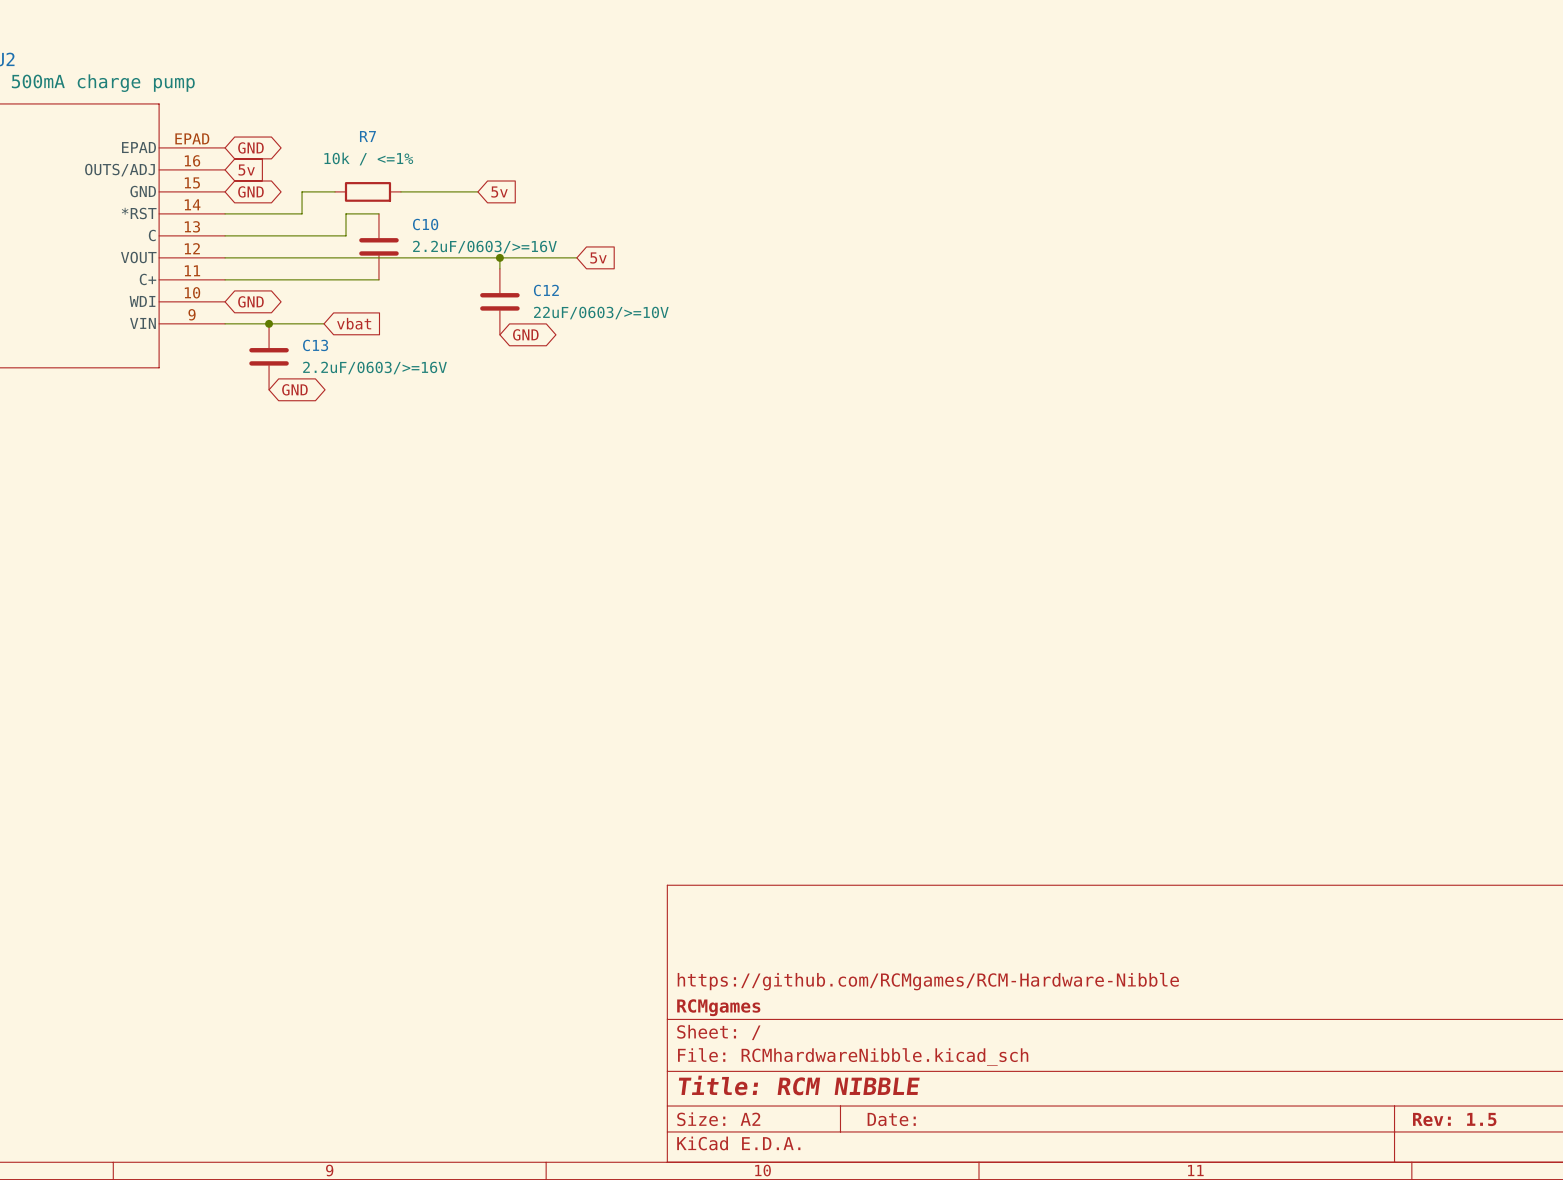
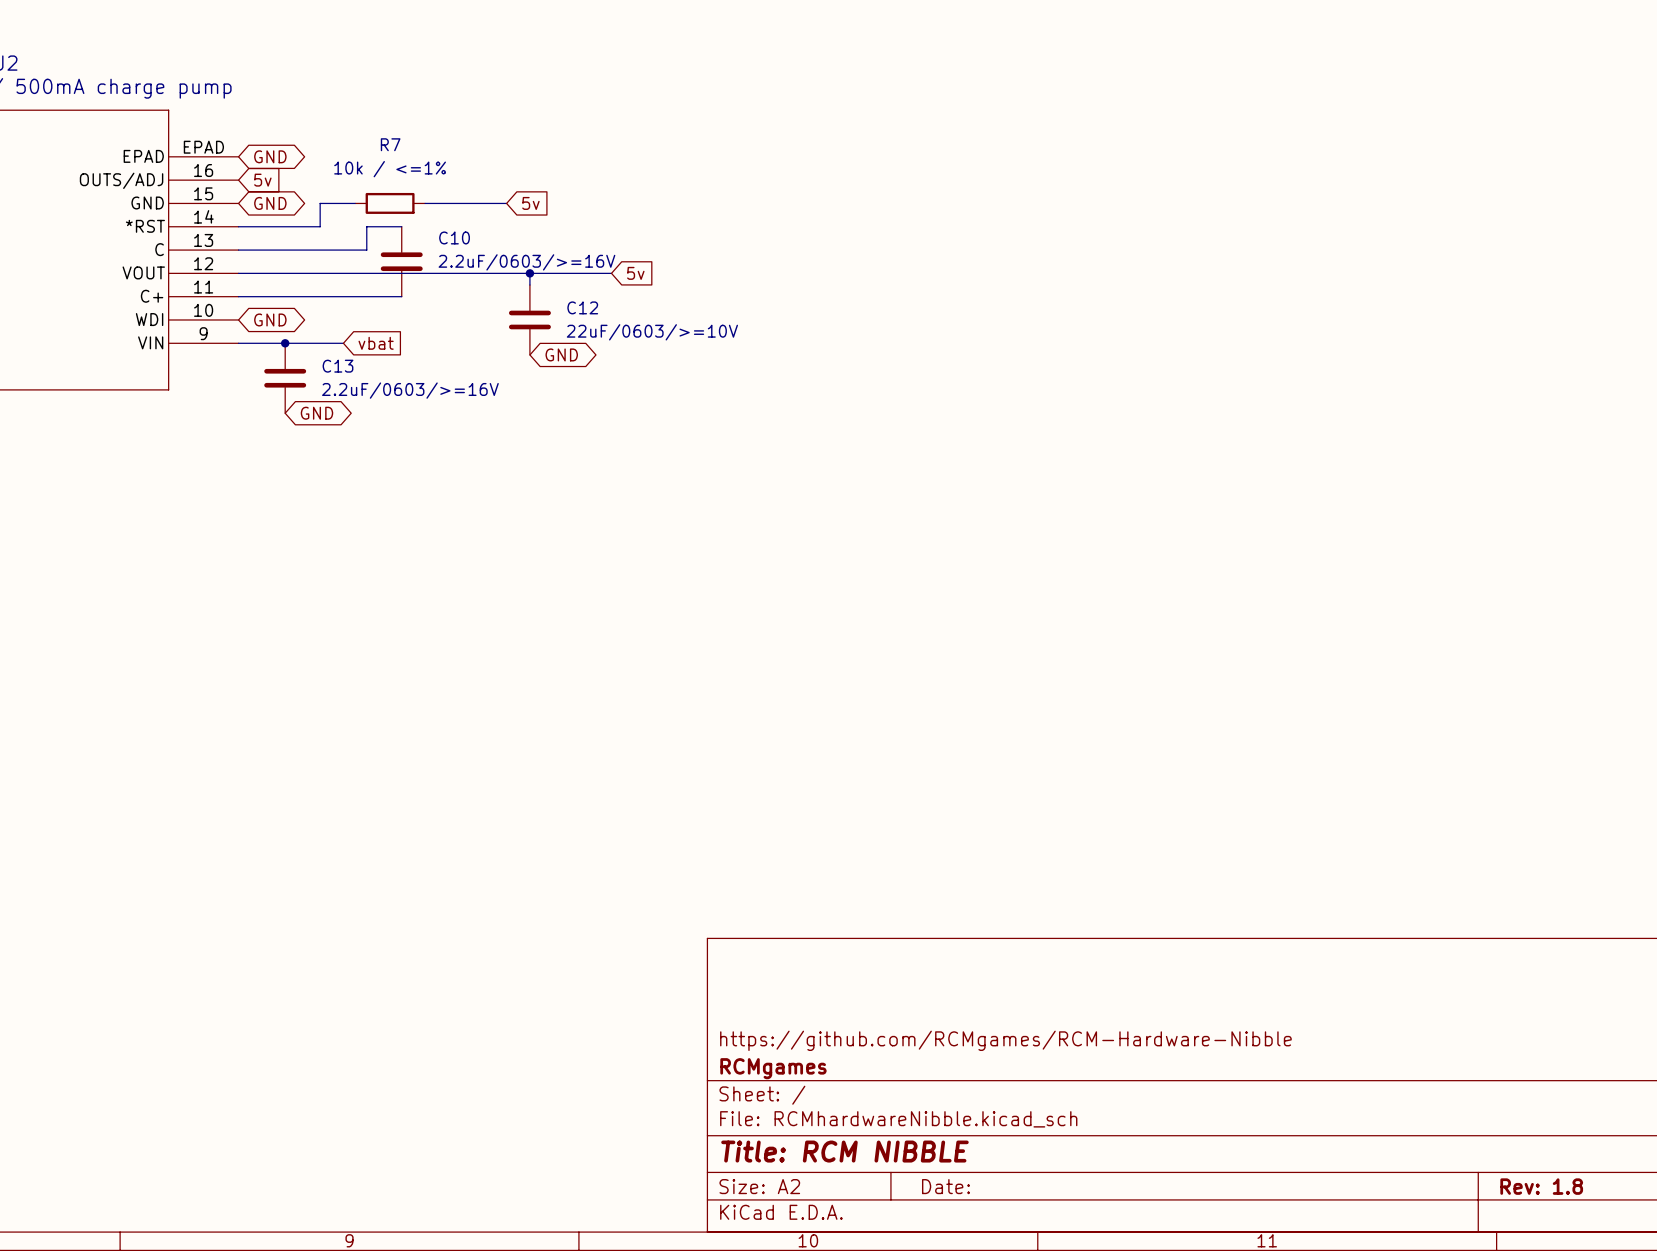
title block: Rev: 1.5 (1454, 1119) -> Rev: 1.8 (1541, 1186)

